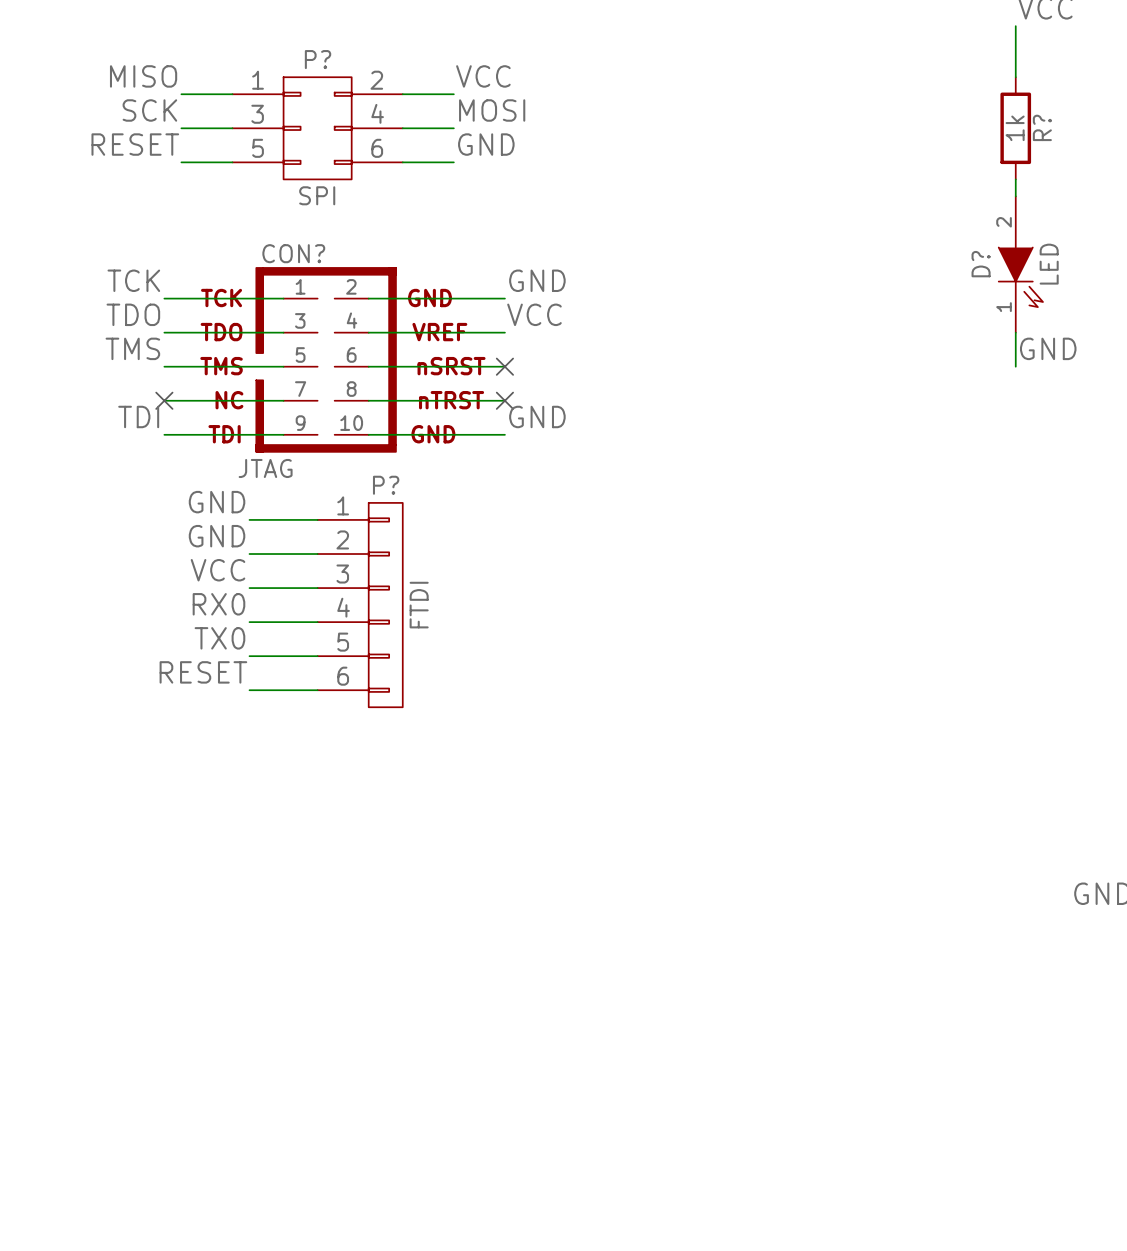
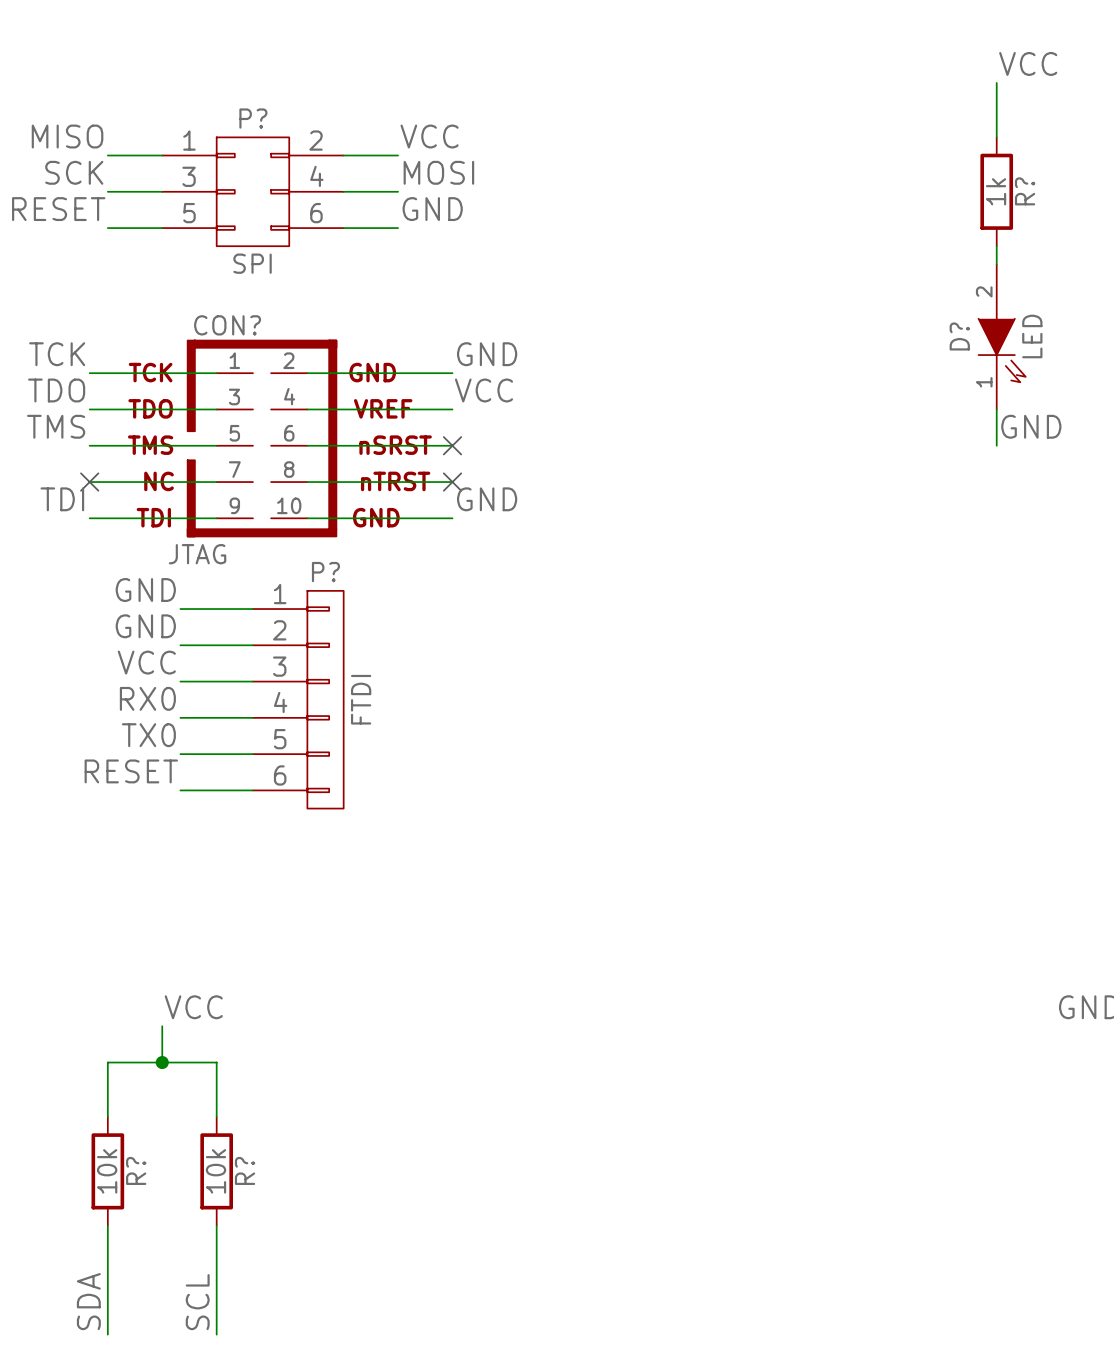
label: none -> VCC (193, 1007)
wire: none -> (162, 1026) (162, 1062)
junction: none -> (162, 1062)
wire: none -> (107, 1116) (107, 1062) (216, 1062) (216, 1116)
R?: none -> 10k (107, 1171)
R?: none -> 10k (216, 1171)
wire: none -> (107, 1225) (107, 1334)
wire: none -> (216, 1225) (216, 1334)
label: none -> SDA (88, 1301)
label: none -> SCL (197, 1302)

